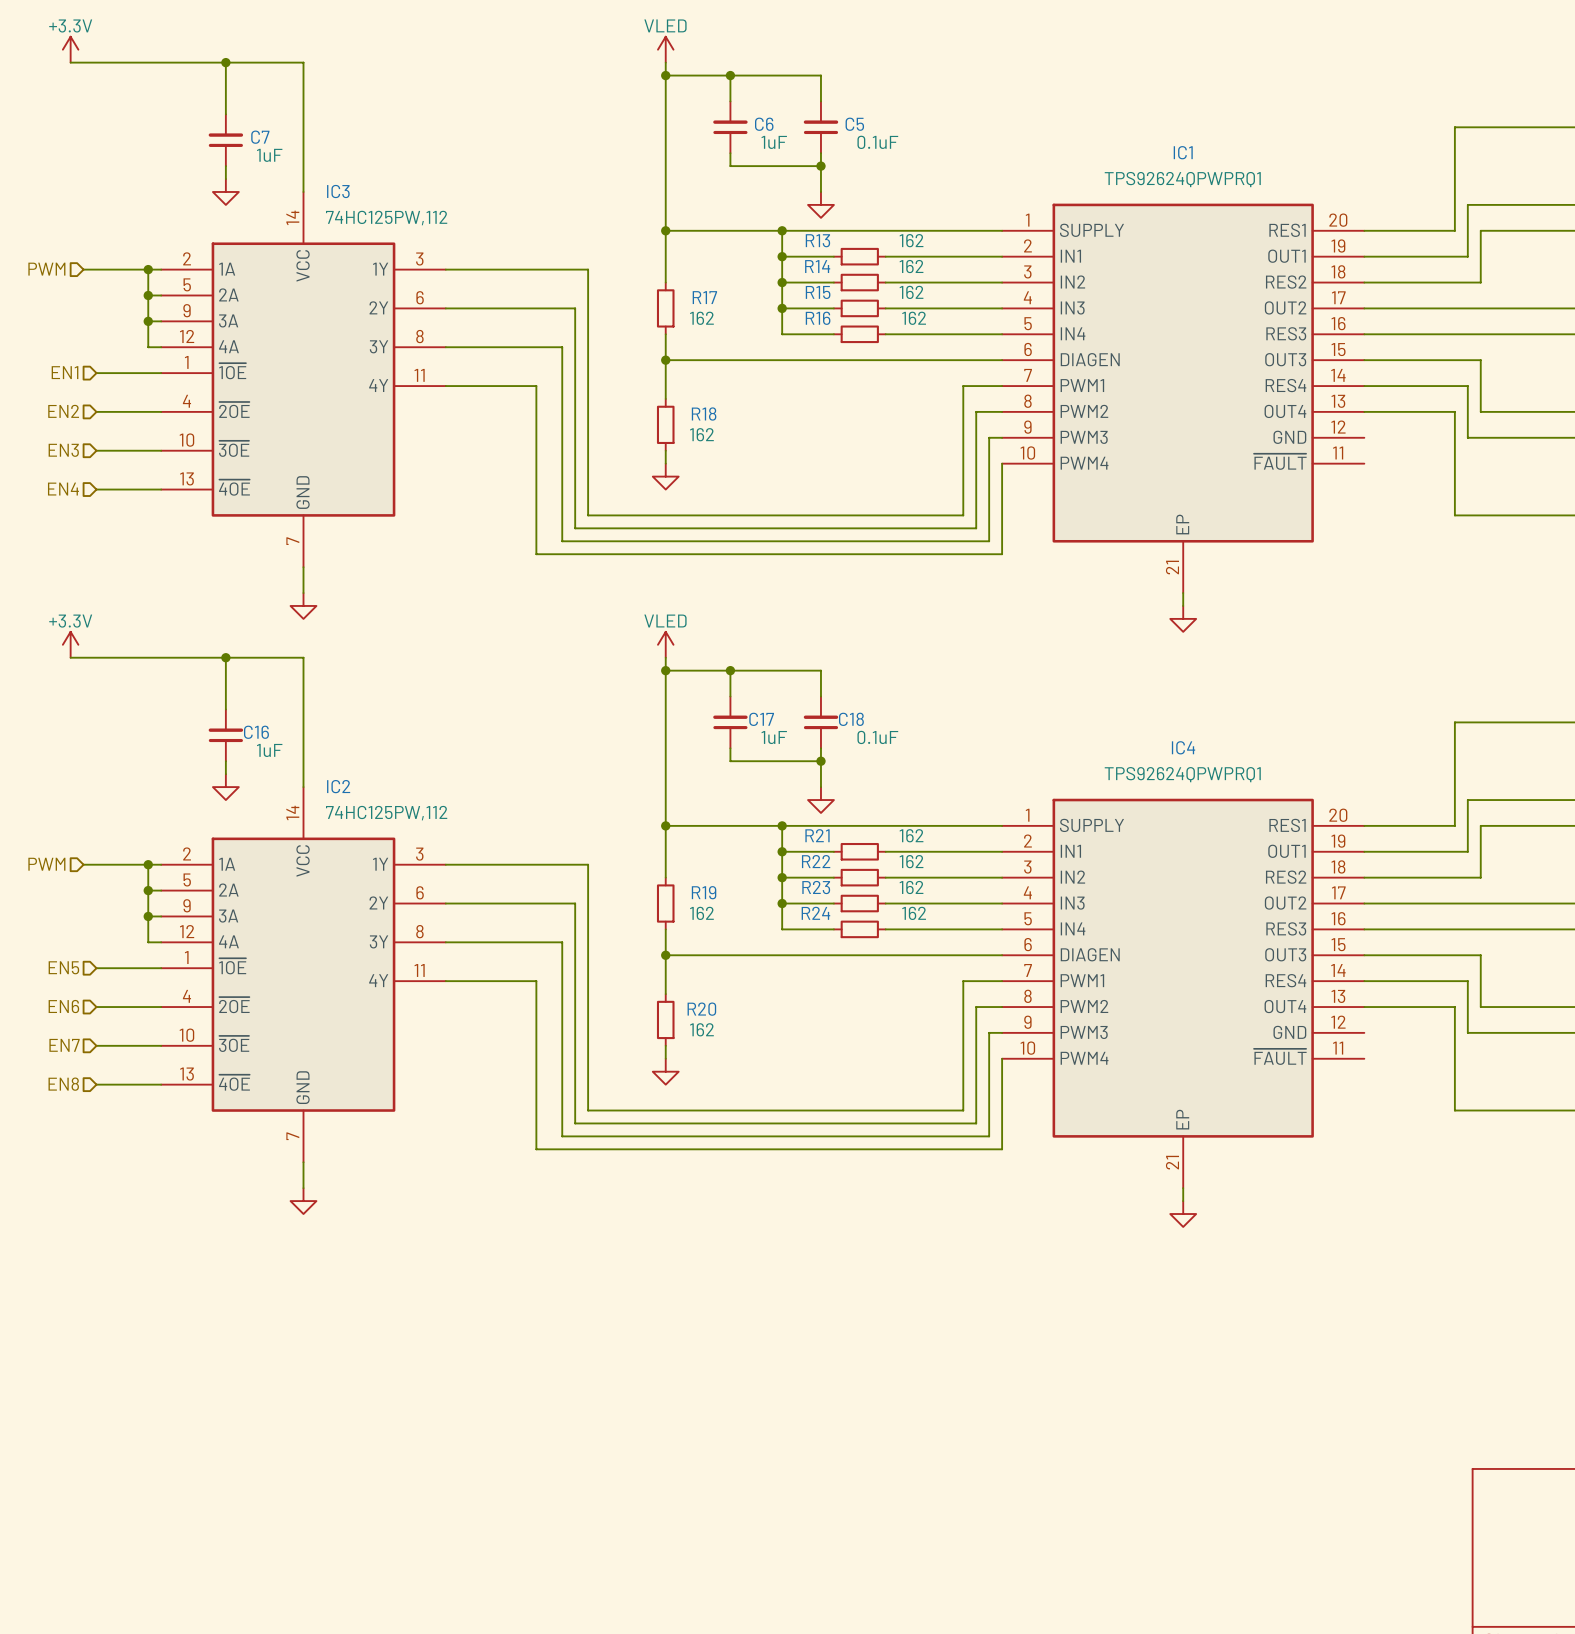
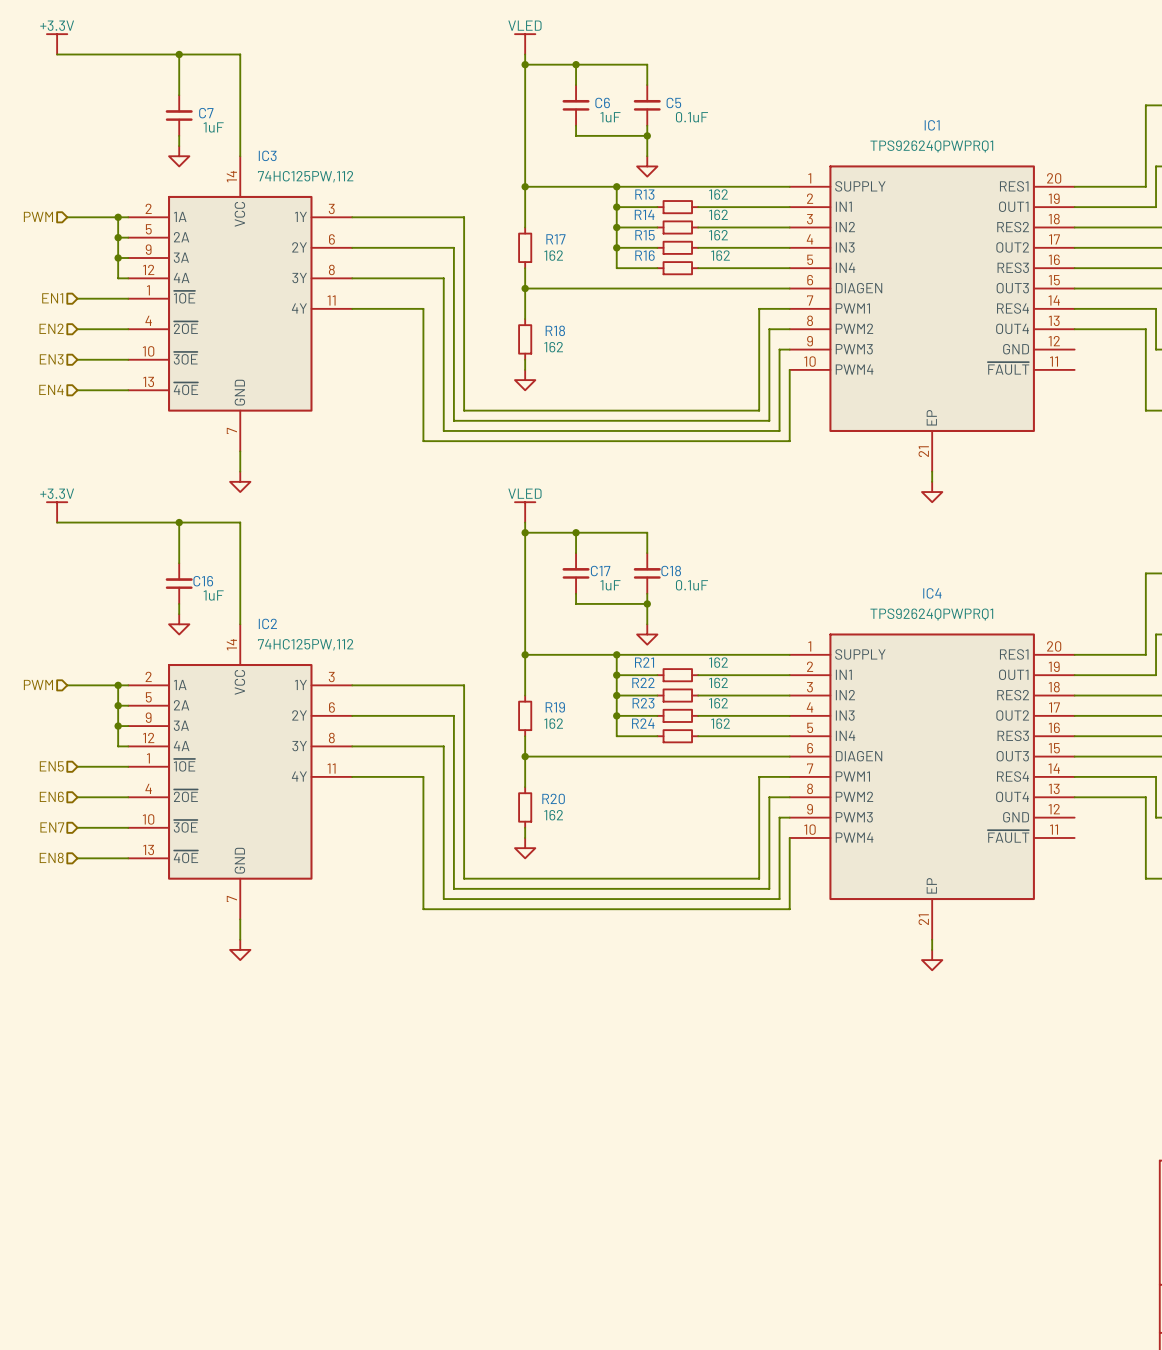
power symbol shape: [62, 36, 79, 63] -> [46, 34, 68, 55]
power symbol shape: [657, 36, 674, 63] -> [514, 34, 536, 55]
power symbol shape: [62, 631, 79, 658] -> [46, 502, 68, 523]
power symbol shape: [657, 631, 674, 658] -> [514, 502, 536, 523]

